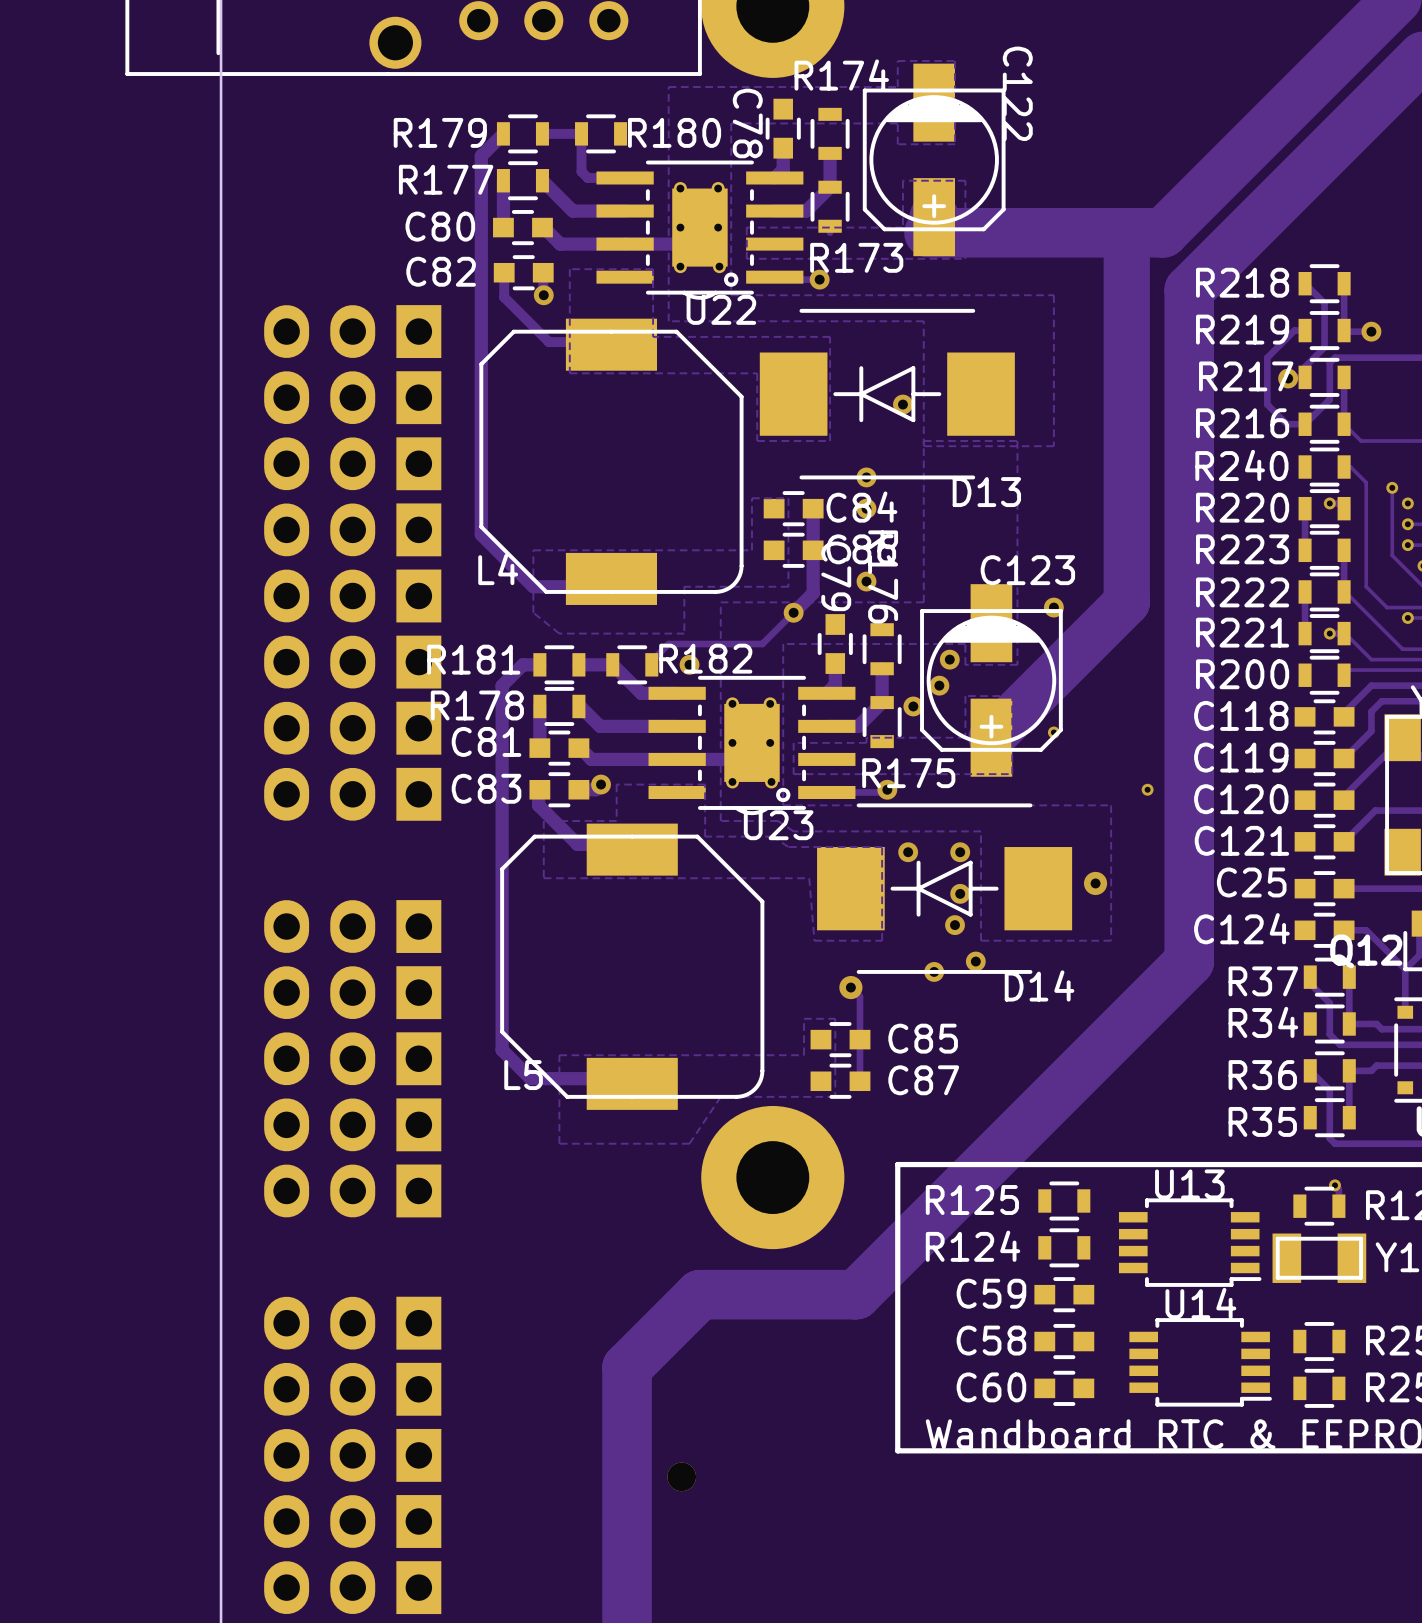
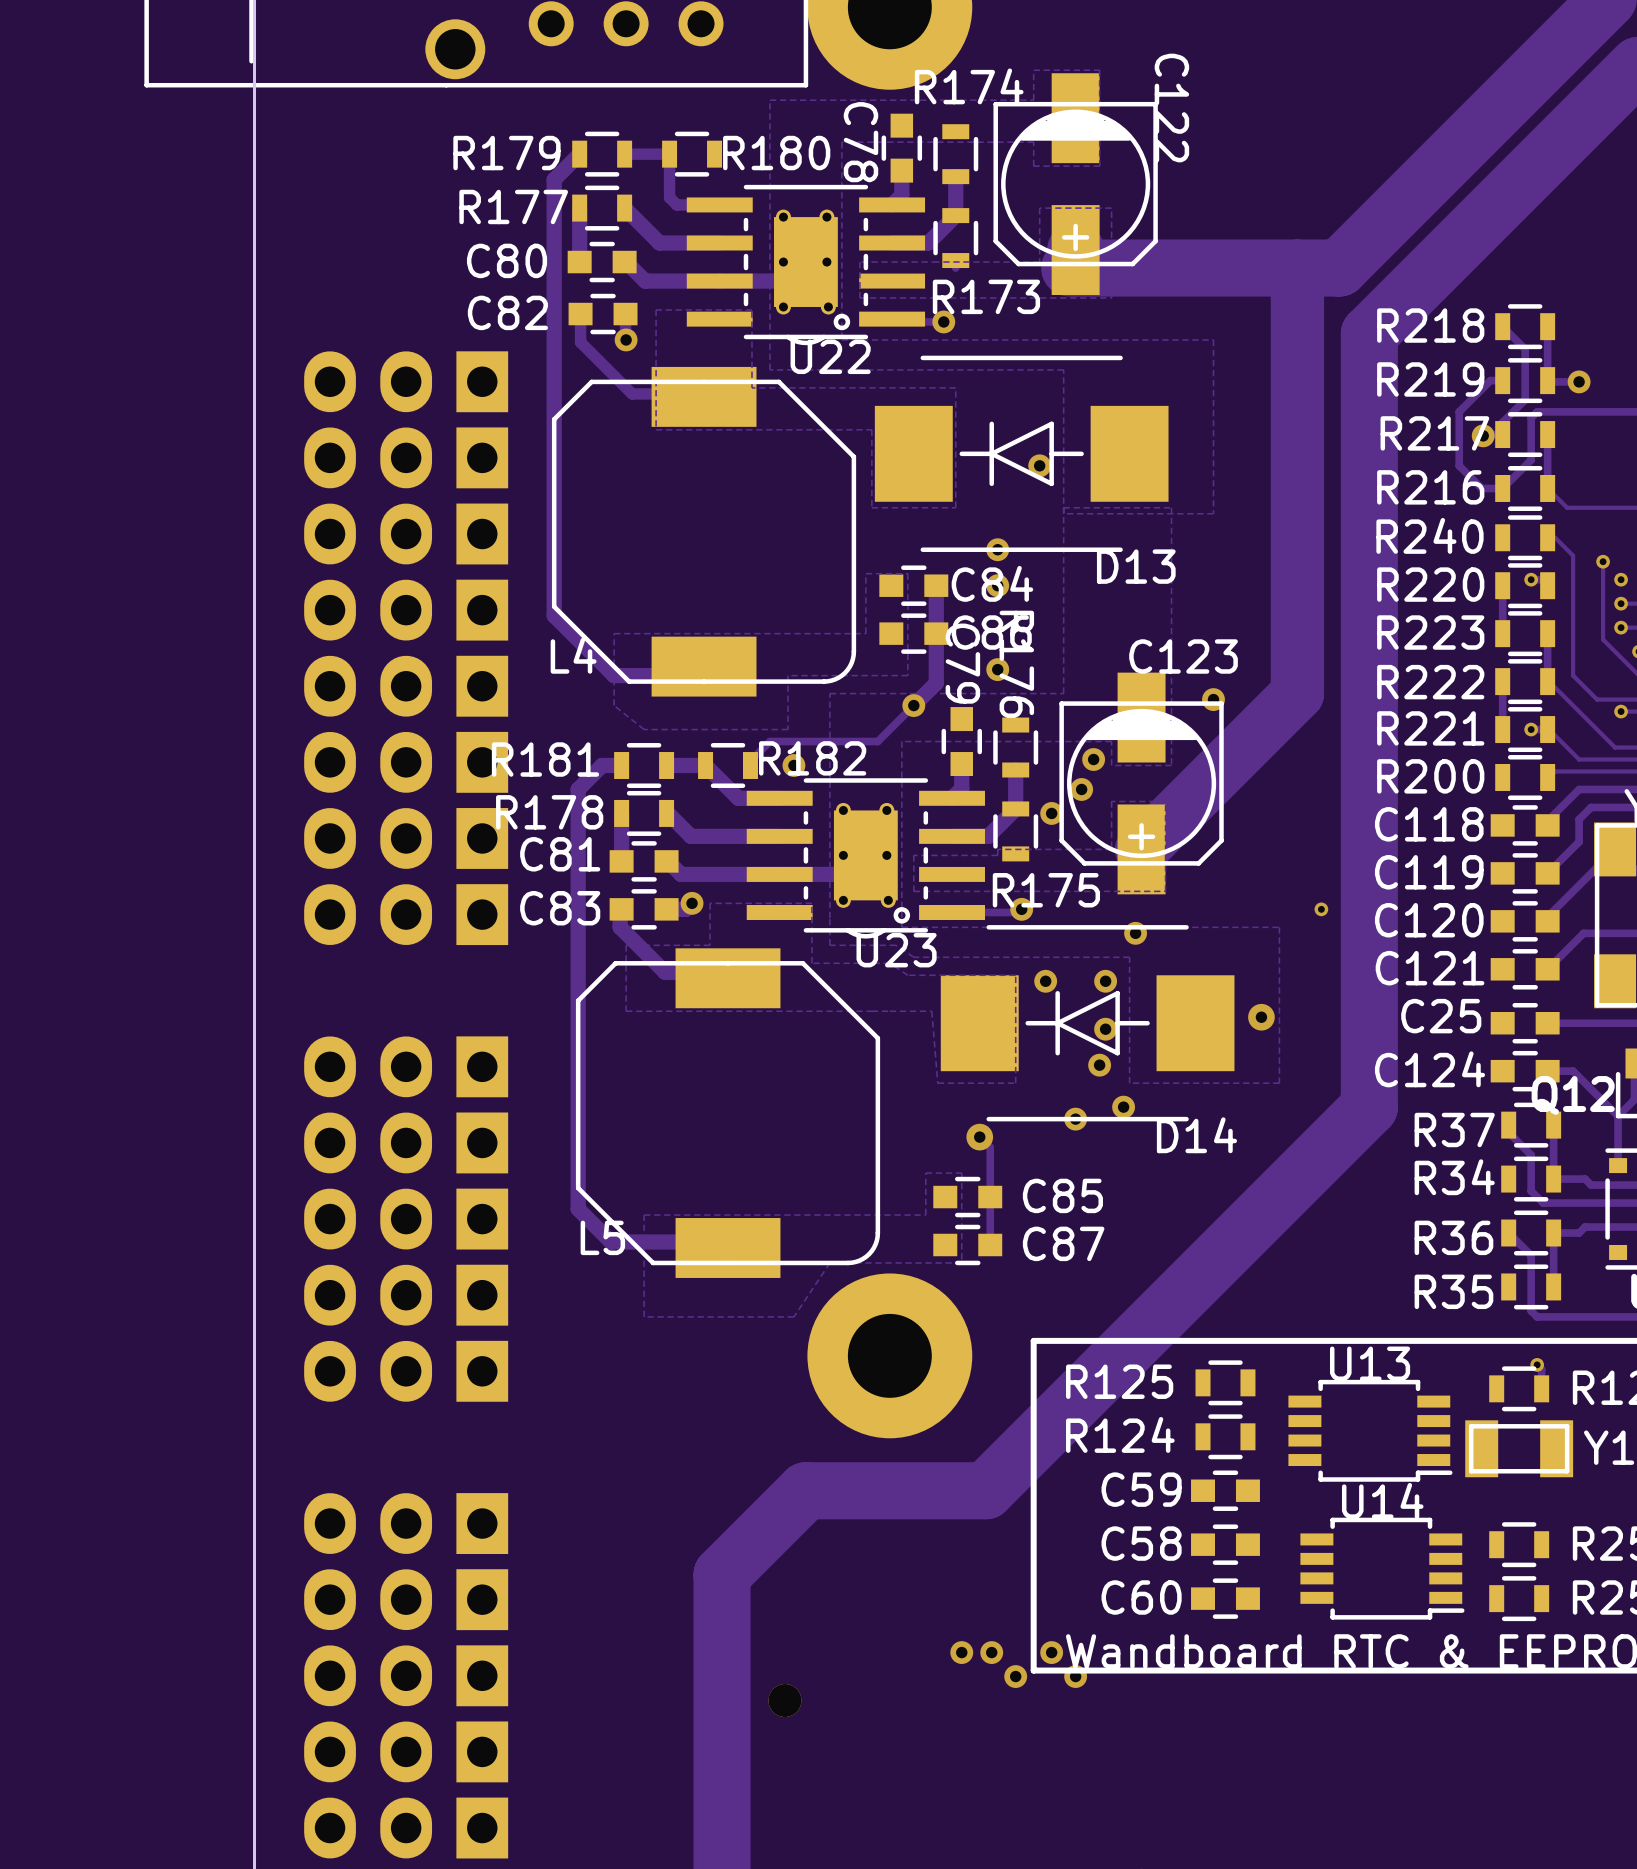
via: (1053, 732) -> none
via: none -> (1135, 933)
via: none -> (961, 1652)
via: none -> (991, 1652)
via: none -> (1051, 1652)
via: none -> (1015, 1676)
via: none -> (1075, 1676)

